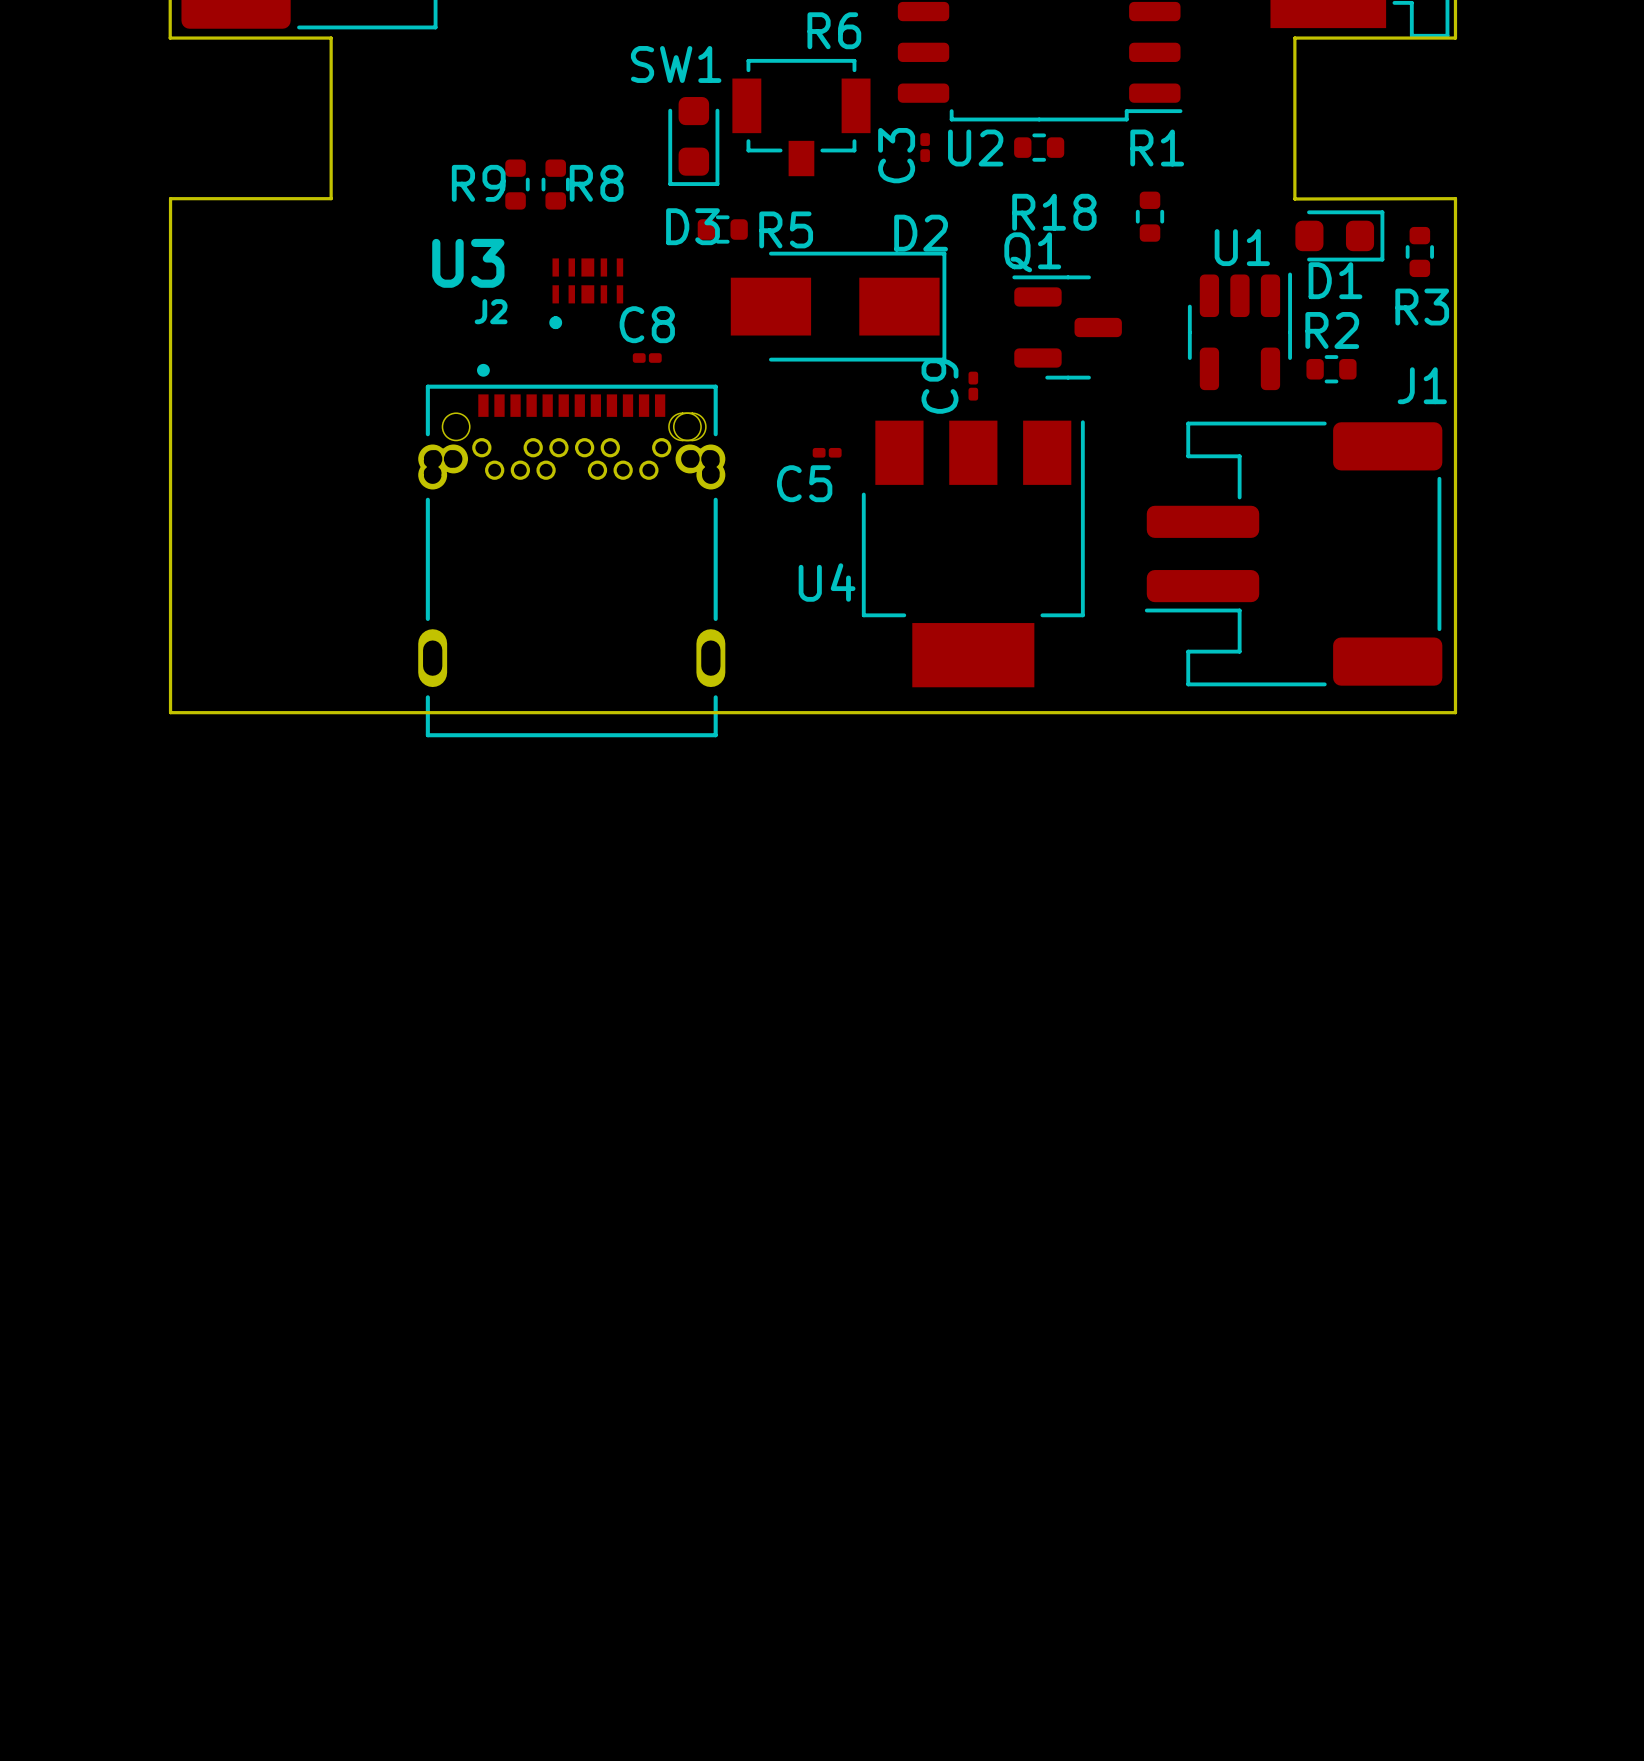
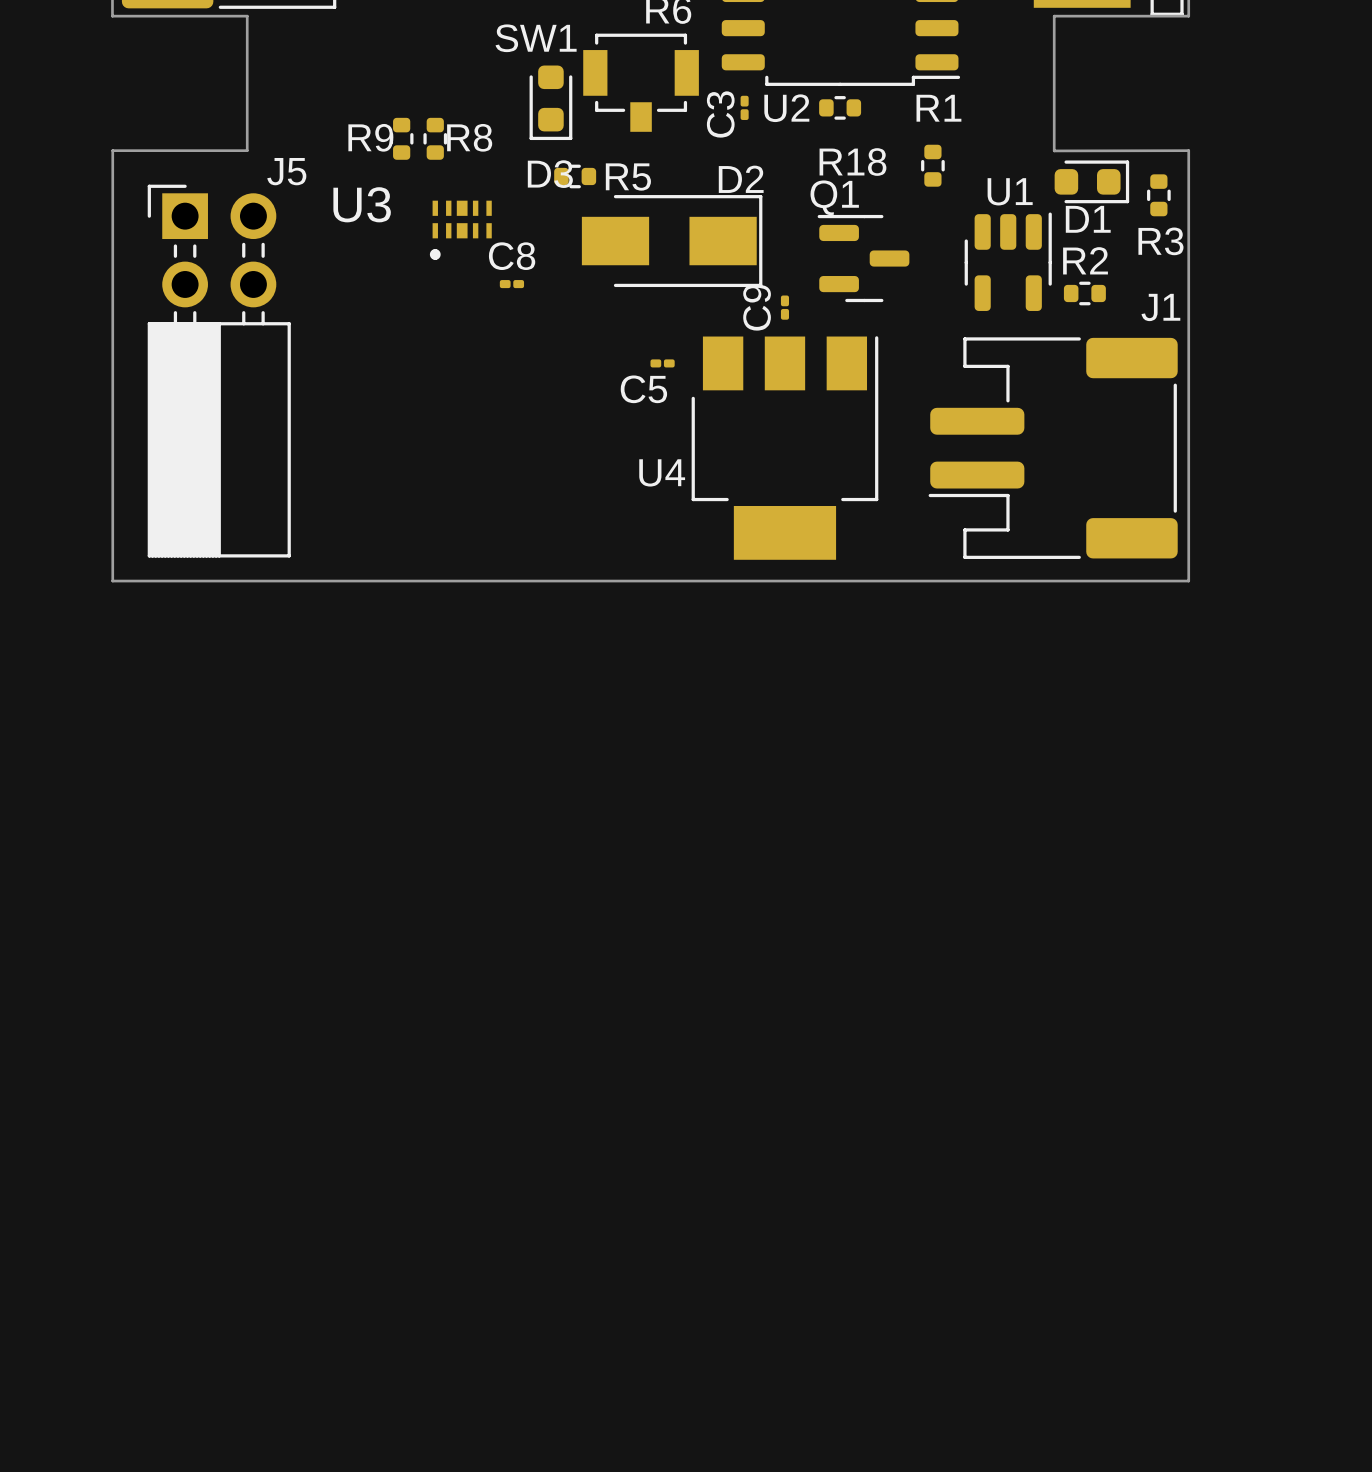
J5: none -> (219, 371)
J2: (571, 550) -> none

